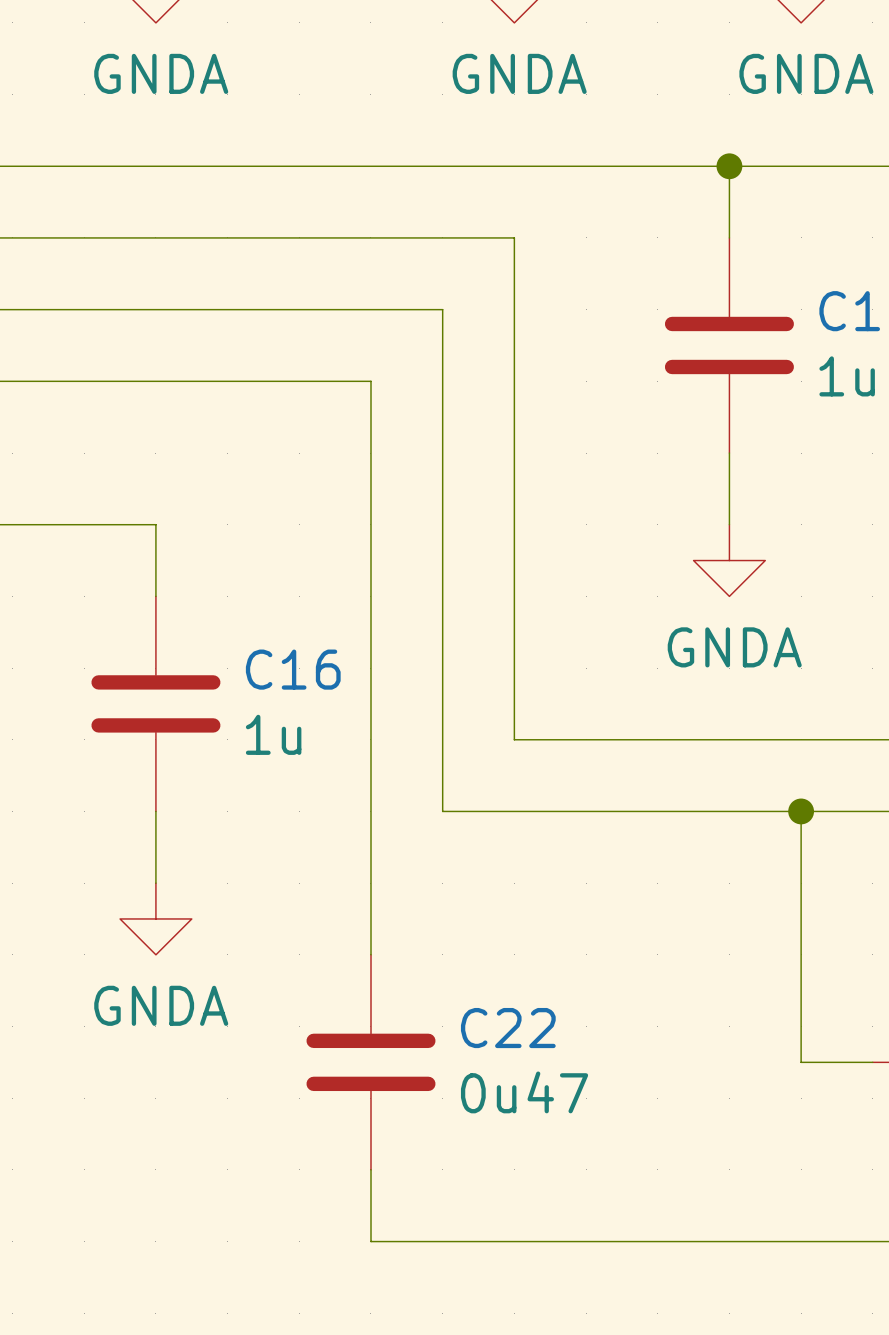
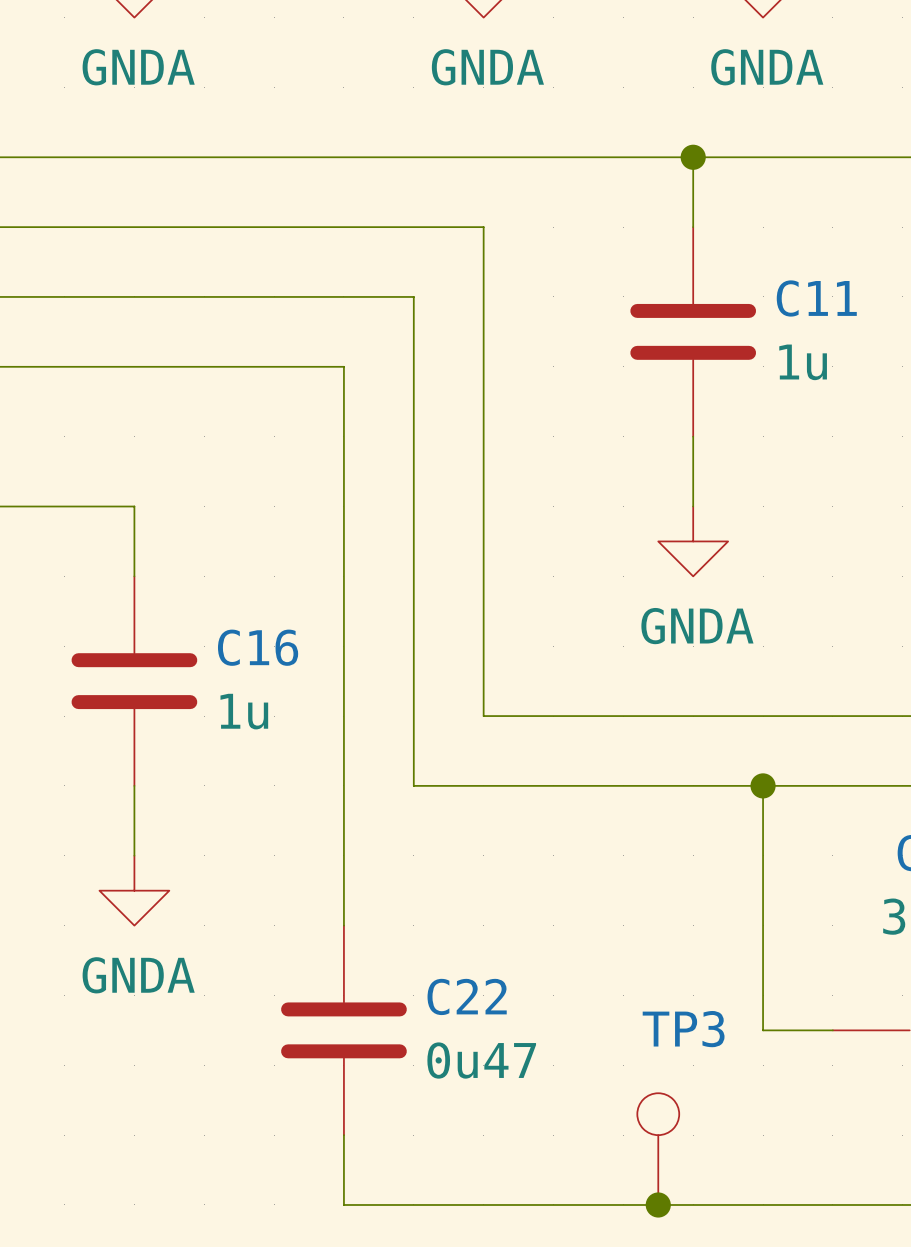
TP3: none -> (658, 1149)
junction: none -> (658, 1204)

